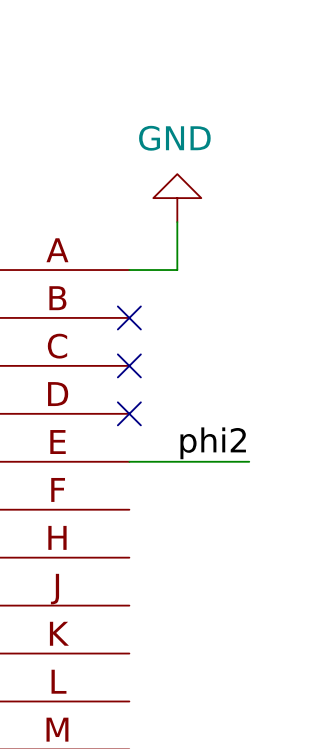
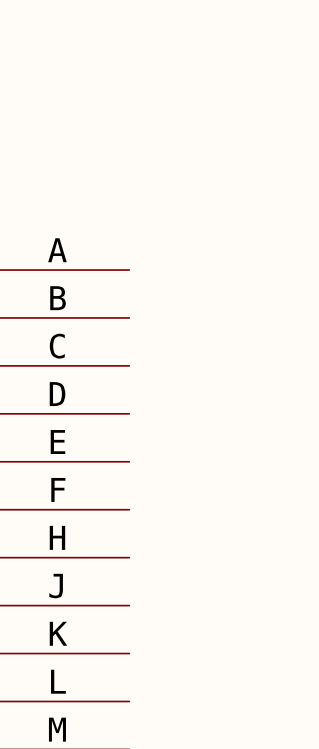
power symbol: GND (177, 198) -> none
wire: (177, 222) (177, 270) (129, 270) -> none
no-connect mark: (129, 317) -> none
no-connect mark: (129, 365) -> none
no-connect mark: (129, 413) -> none
label: phi2 (213, 443) -> none
wire: (129, 461) (249, 461) -> none

